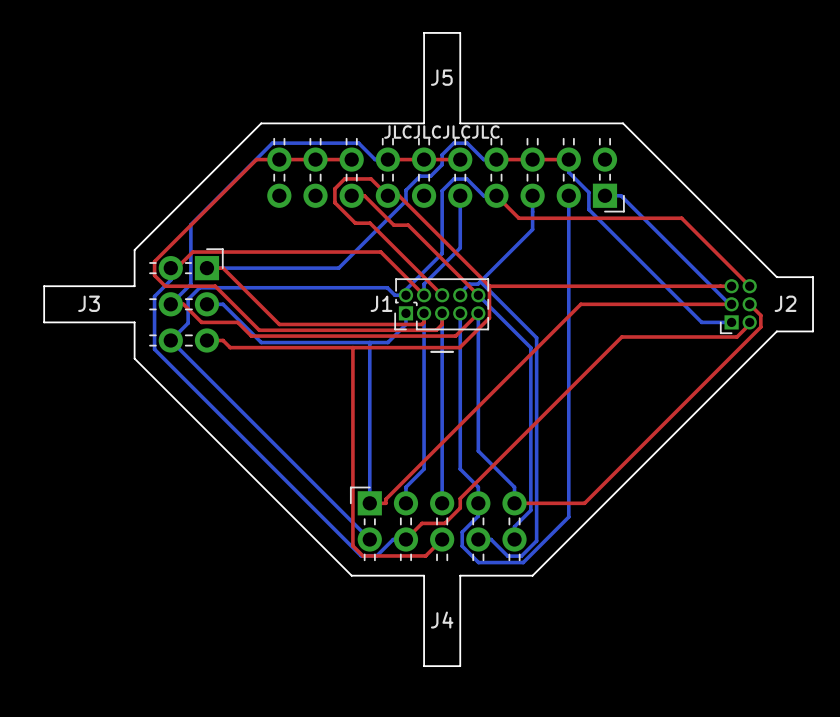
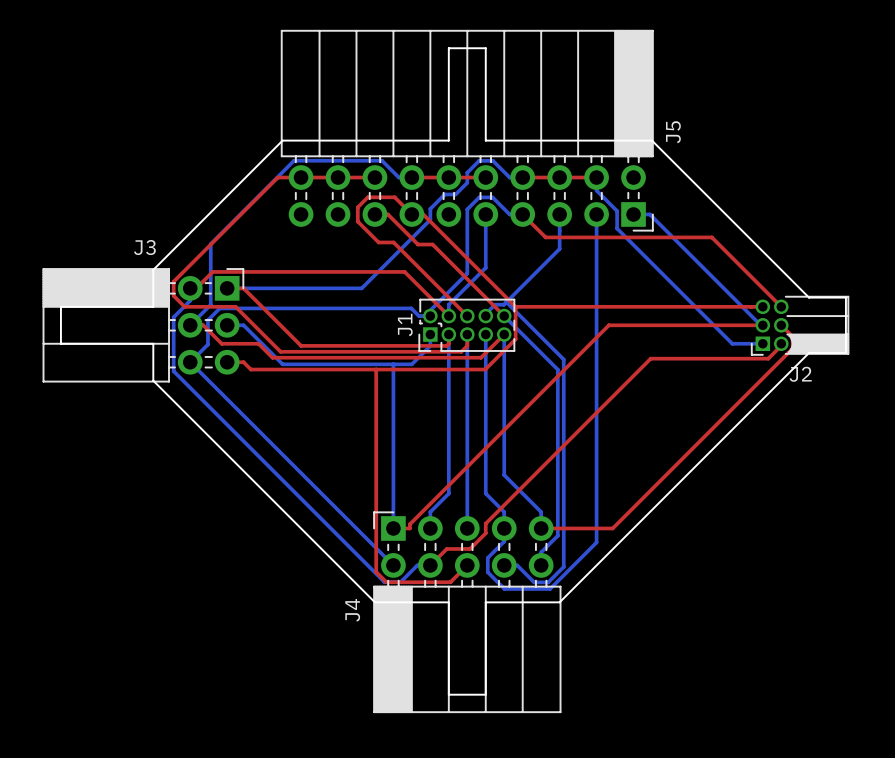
J5 name position: J5 (441, 77) -> J5 (673, 132)
text: JLCJLCJLCJLC (441, 132) -> none
J5 footprint: [267, 137, 625, 213] -> [280, 29, 654, 232]
J3 footprint: [149, 248, 224, 353] -> [42, 268, 245, 383]
J2 footprint: [719, 279, 757, 335] -> [750, 295, 850, 356]
J3 name position: J3 (89, 303) -> J3 (144, 247)
J1 name rotation: 0° (381, 303) -> 90° counterclockwise (405, 325)
J2 name position: J2 (785, 303) -> J2 (800, 374)
text: - (442, 351) -> none
J4 footprint: [349, 486, 527, 562] -> [373, 511, 562, 714]
J4 name position: J4 (442, 620) -> J4 (352, 610)

